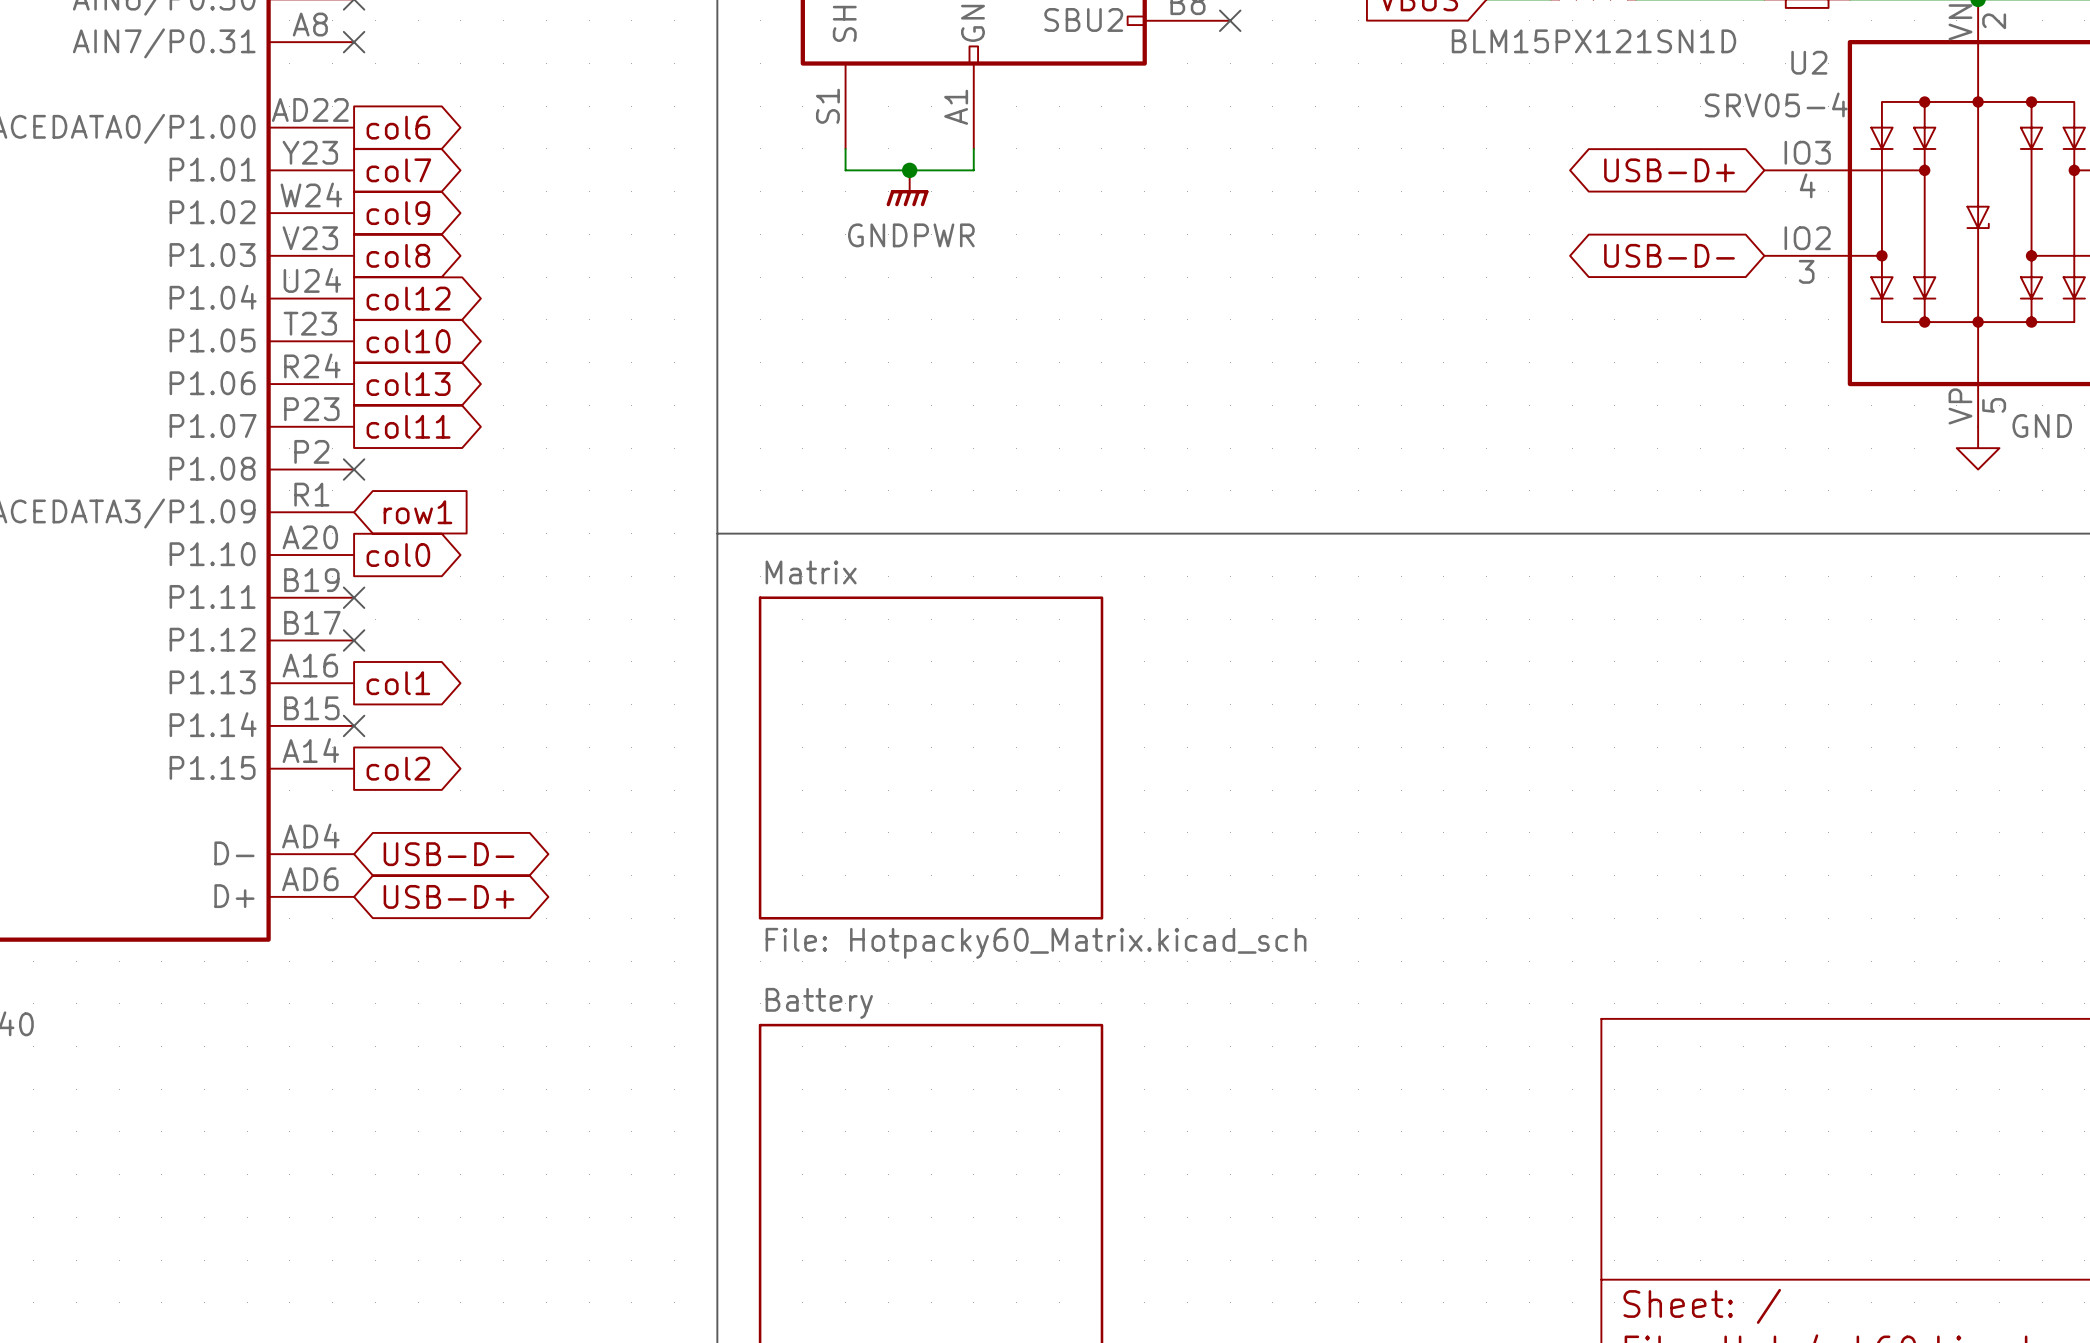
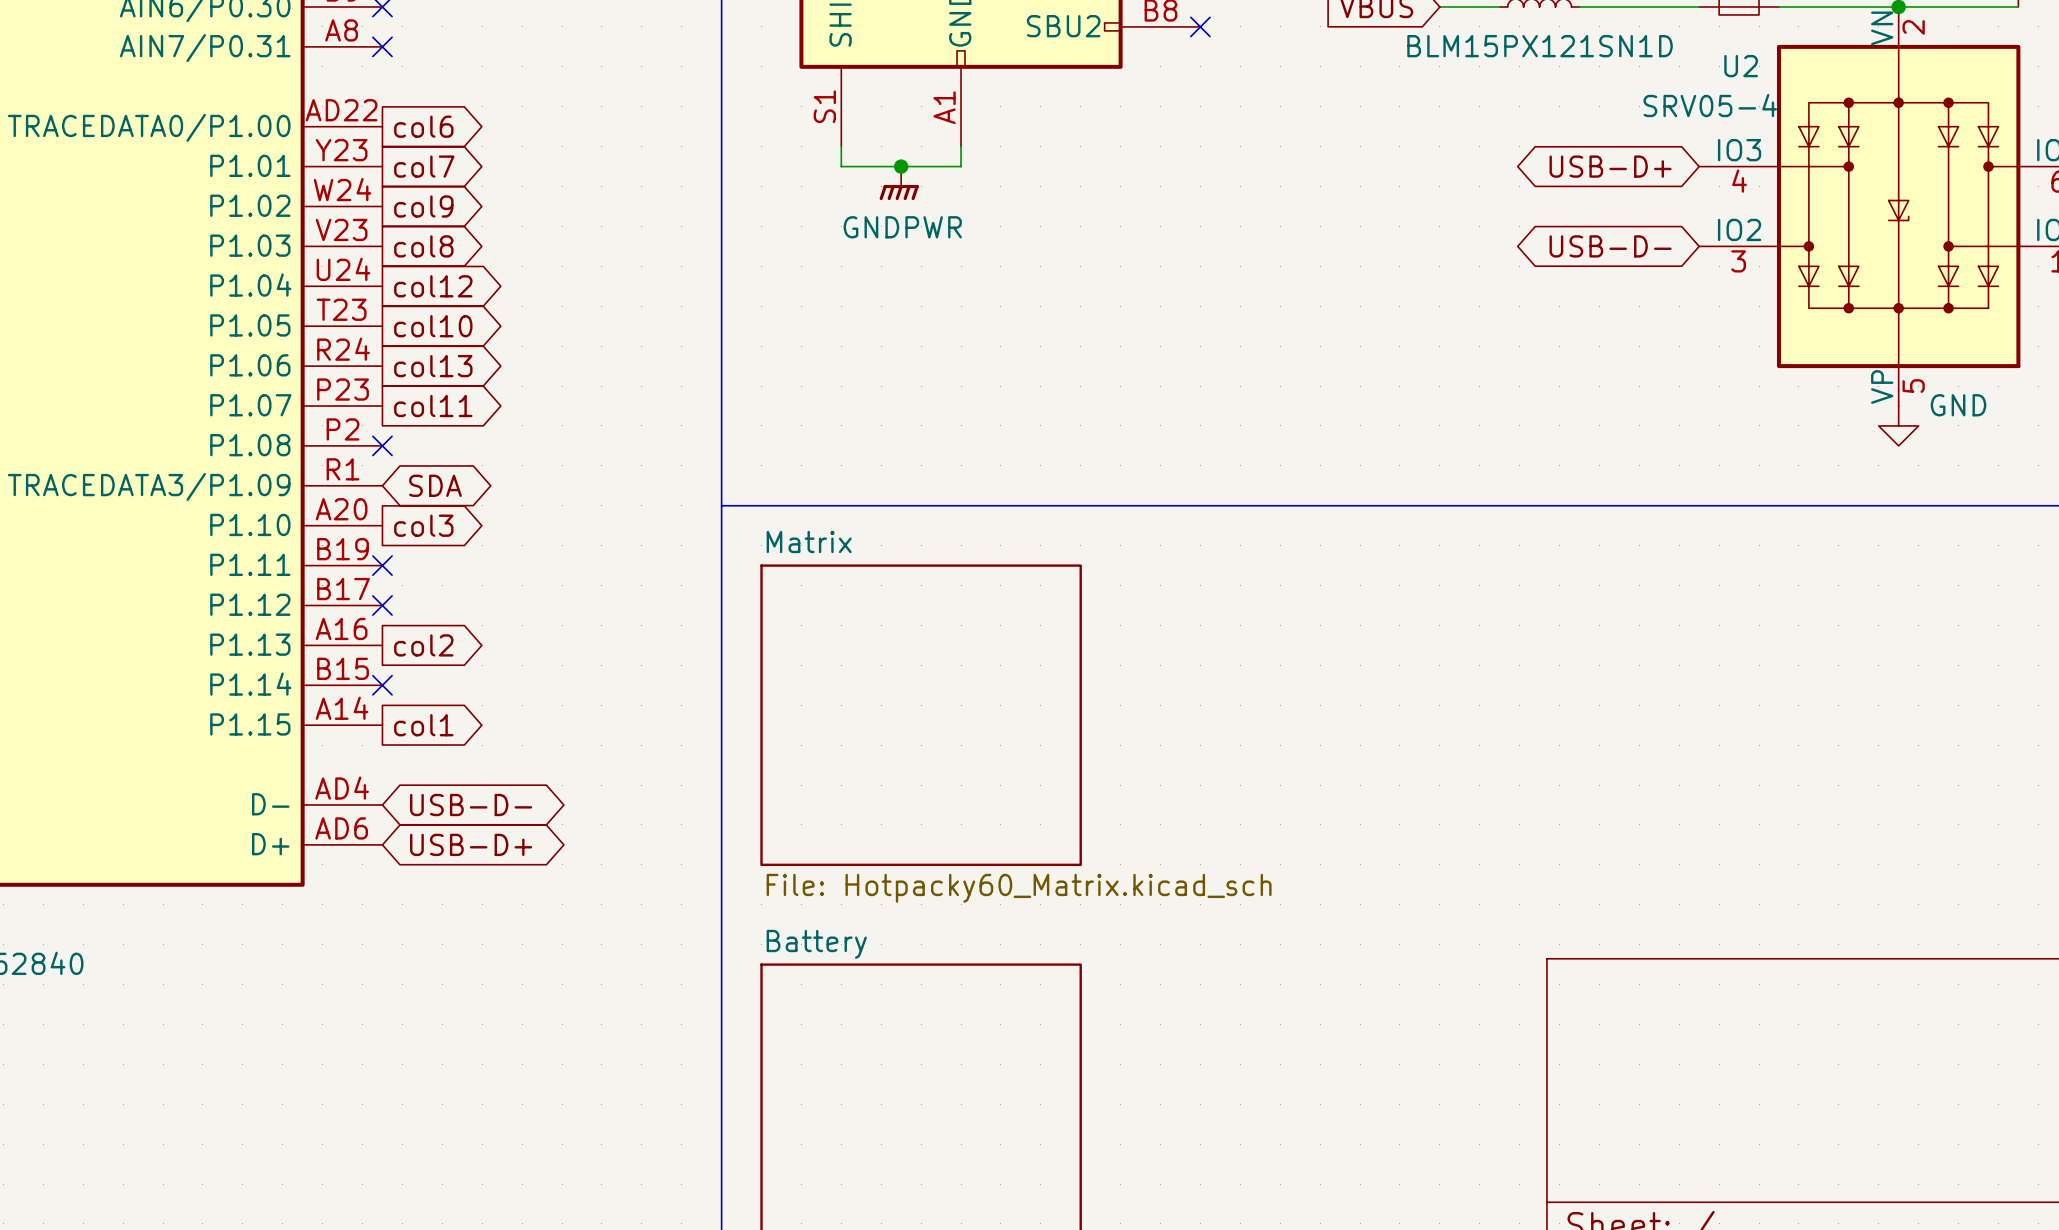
global label shape: input (417, 512) -> bidirectional (435, 485)
global label: row1 (417, 512) -> SDA (435, 485)
global label: col0 (398, 555) -> col3 (423, 525)
global label: col1 (398, 683) -> col2 (423, 645)
global label: col2 (398, 768) -> col1 (423, 725)

